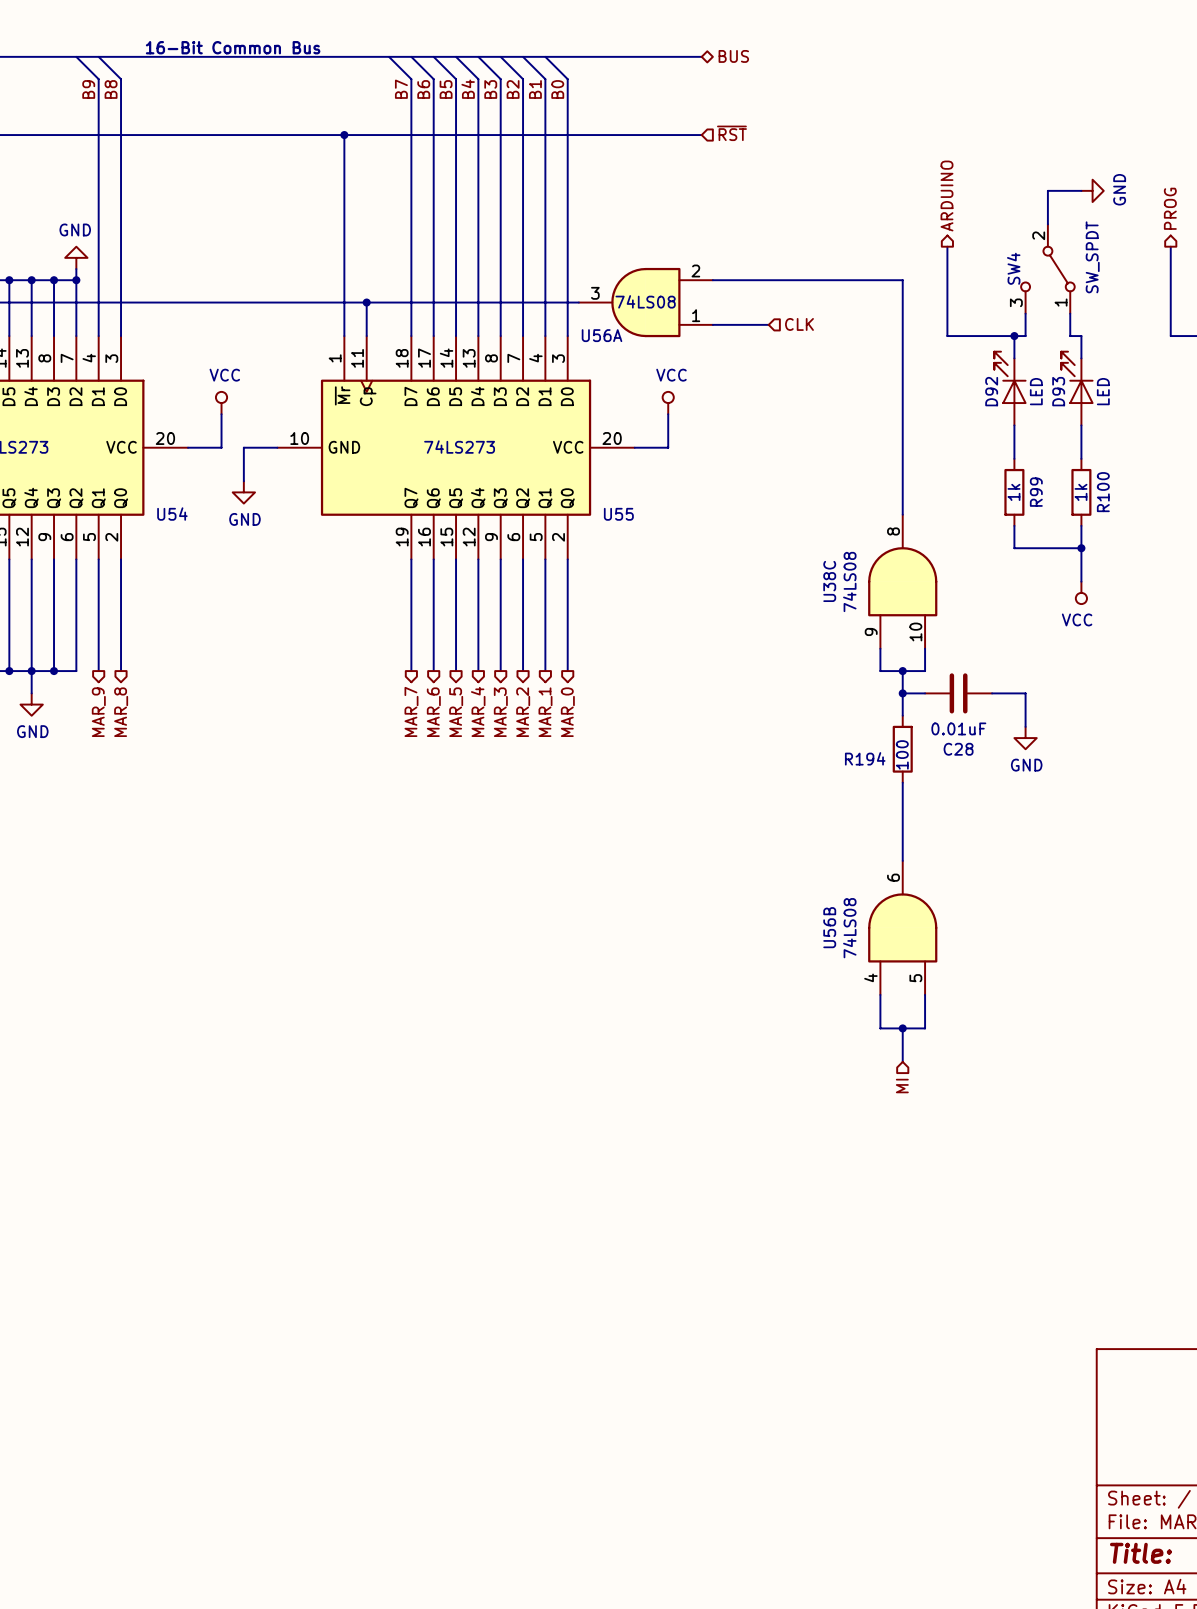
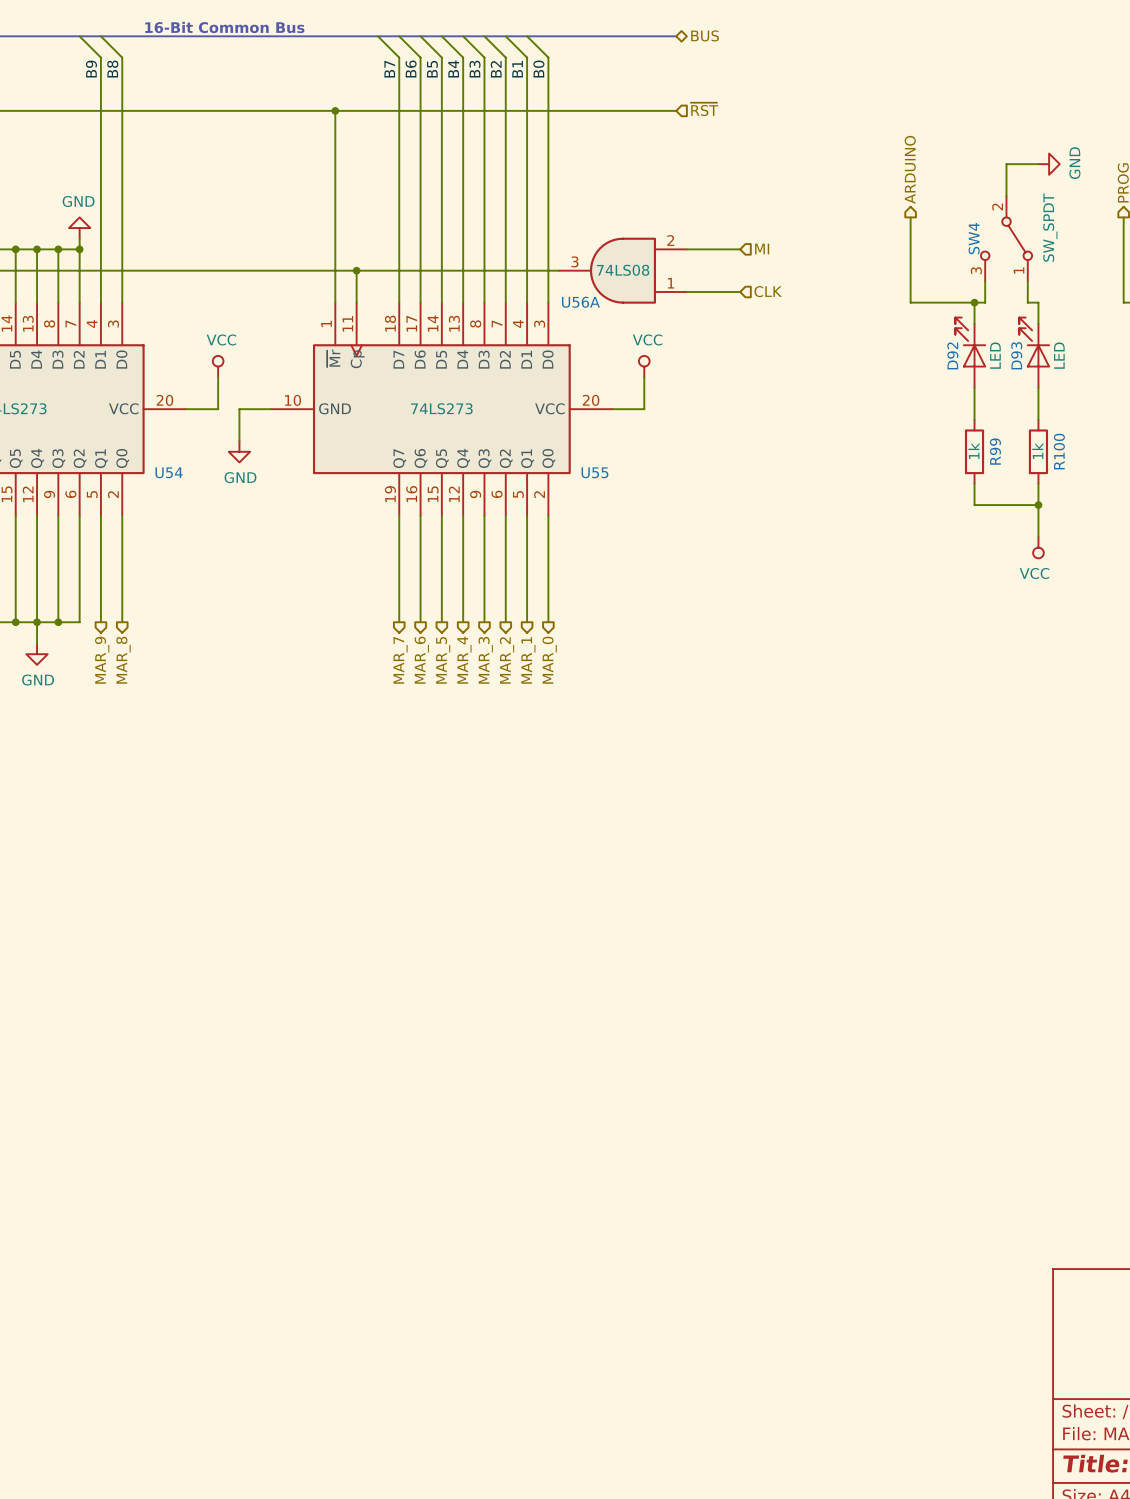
hierarchical label: none -> MI (762, 248)
wire: (768, 280) (902, 280) (902, 514) -> none
U38C: 74LS08 (902, 581) -> none
wire: (880, 648) (880, 671) (925, 671) (925, 648) -> none
wire: (902, 671) (902, 715) -> none
junction: (902, 671) -> none
wire: (902, 693) (925, 693) -> none
junction: (902, 693) -> none
C28: 0.01uF (958, 693) -> none
wire: (992, 693) (1025, 693) (1025, 726) -> none
power symbol: GND (1025, 738) -> none
R194: 100 (902, 749) -> none
wire: (902, 782) (902, 860) -> none
U56B: 74LS08 (902, 927) -> none
wire: (880, 994) (880, 1028) (925, 1028) (925, 994) -> none
wire: (902, 1028) (902, 1061) -> none
junction: (902, 1028) -> none
hierarchical label: MI (902, 1086) -> none

